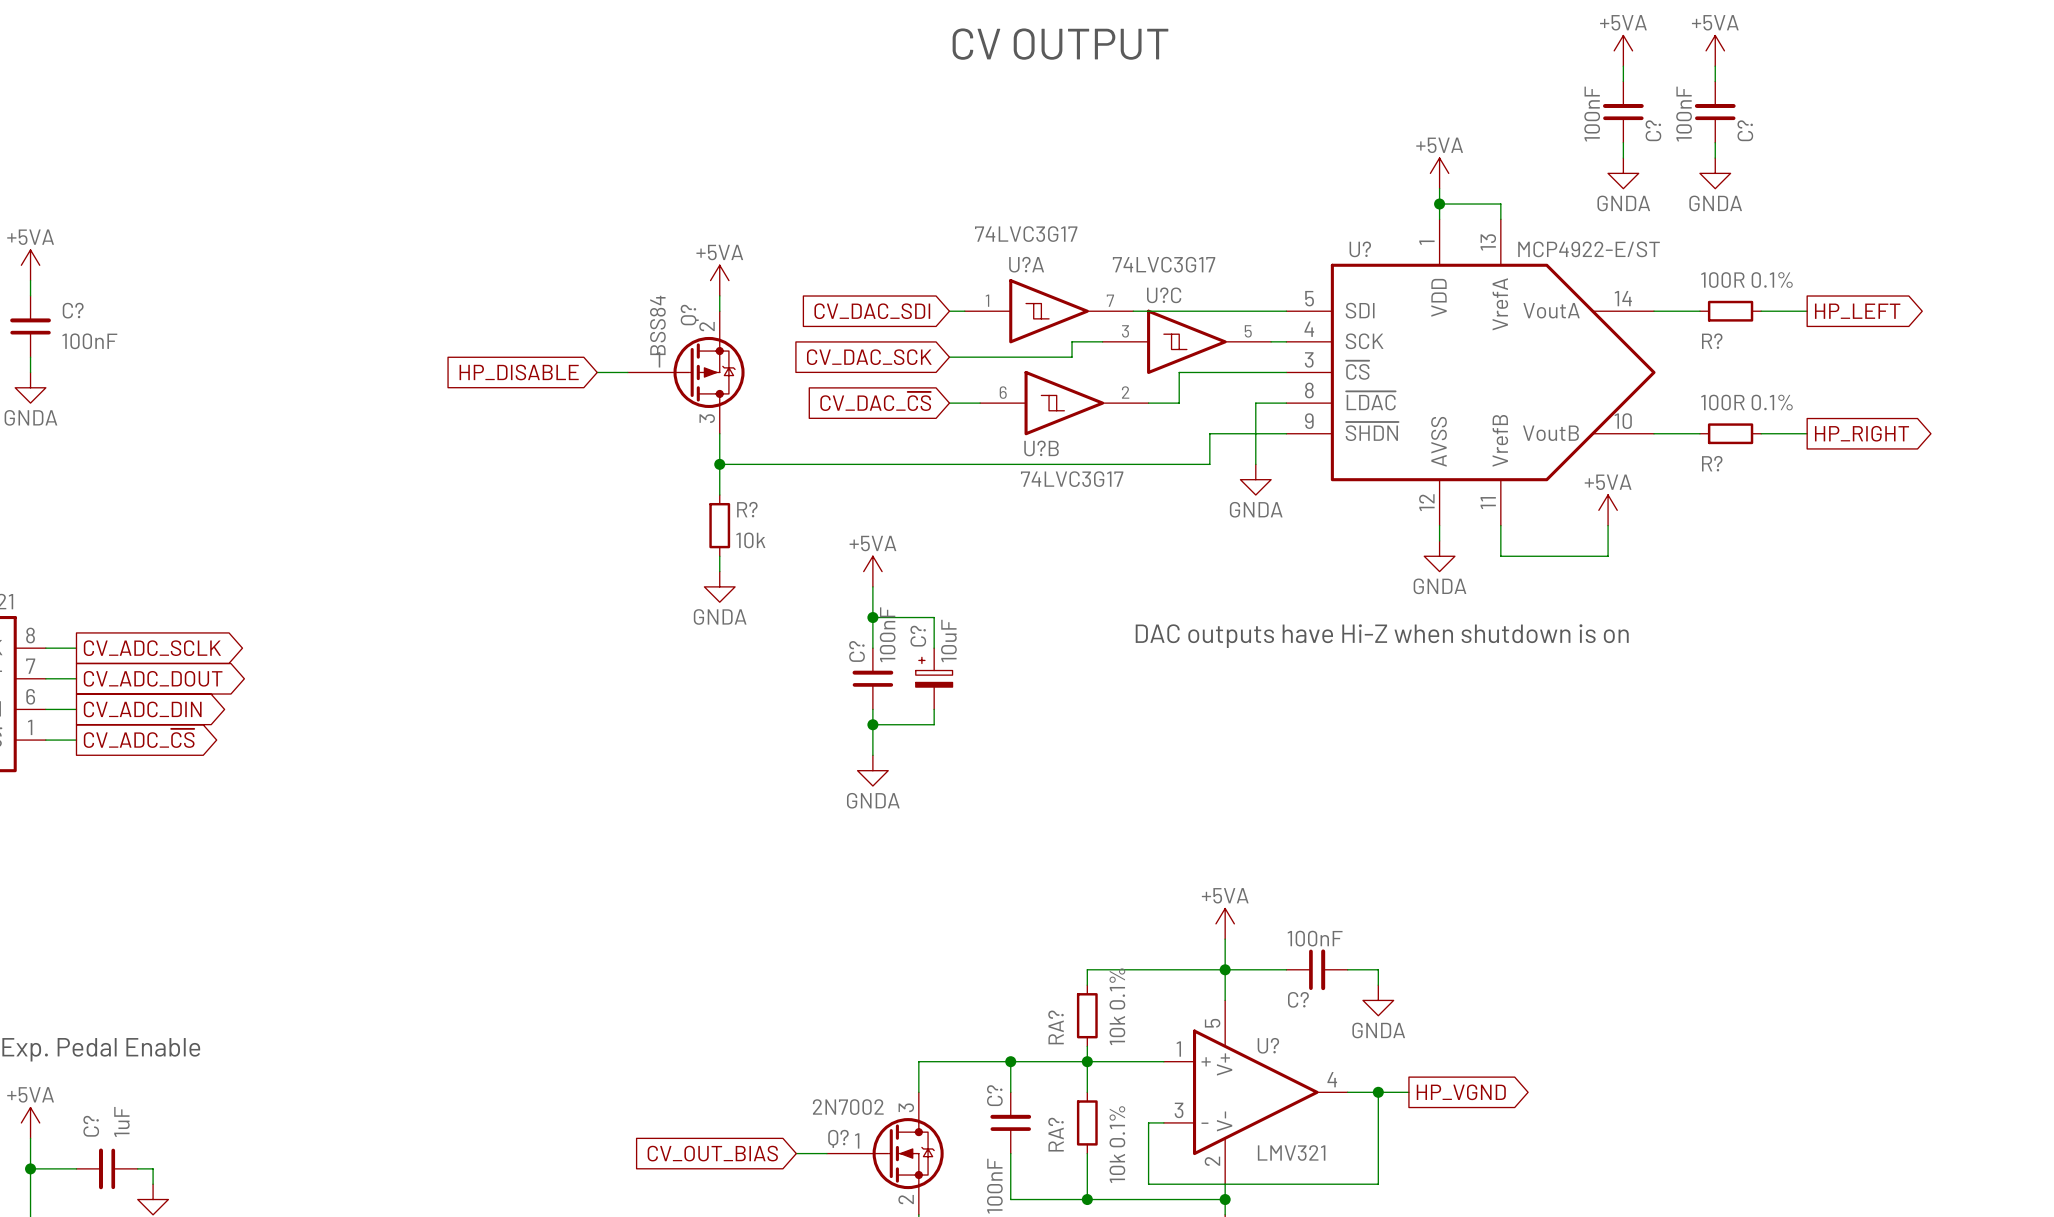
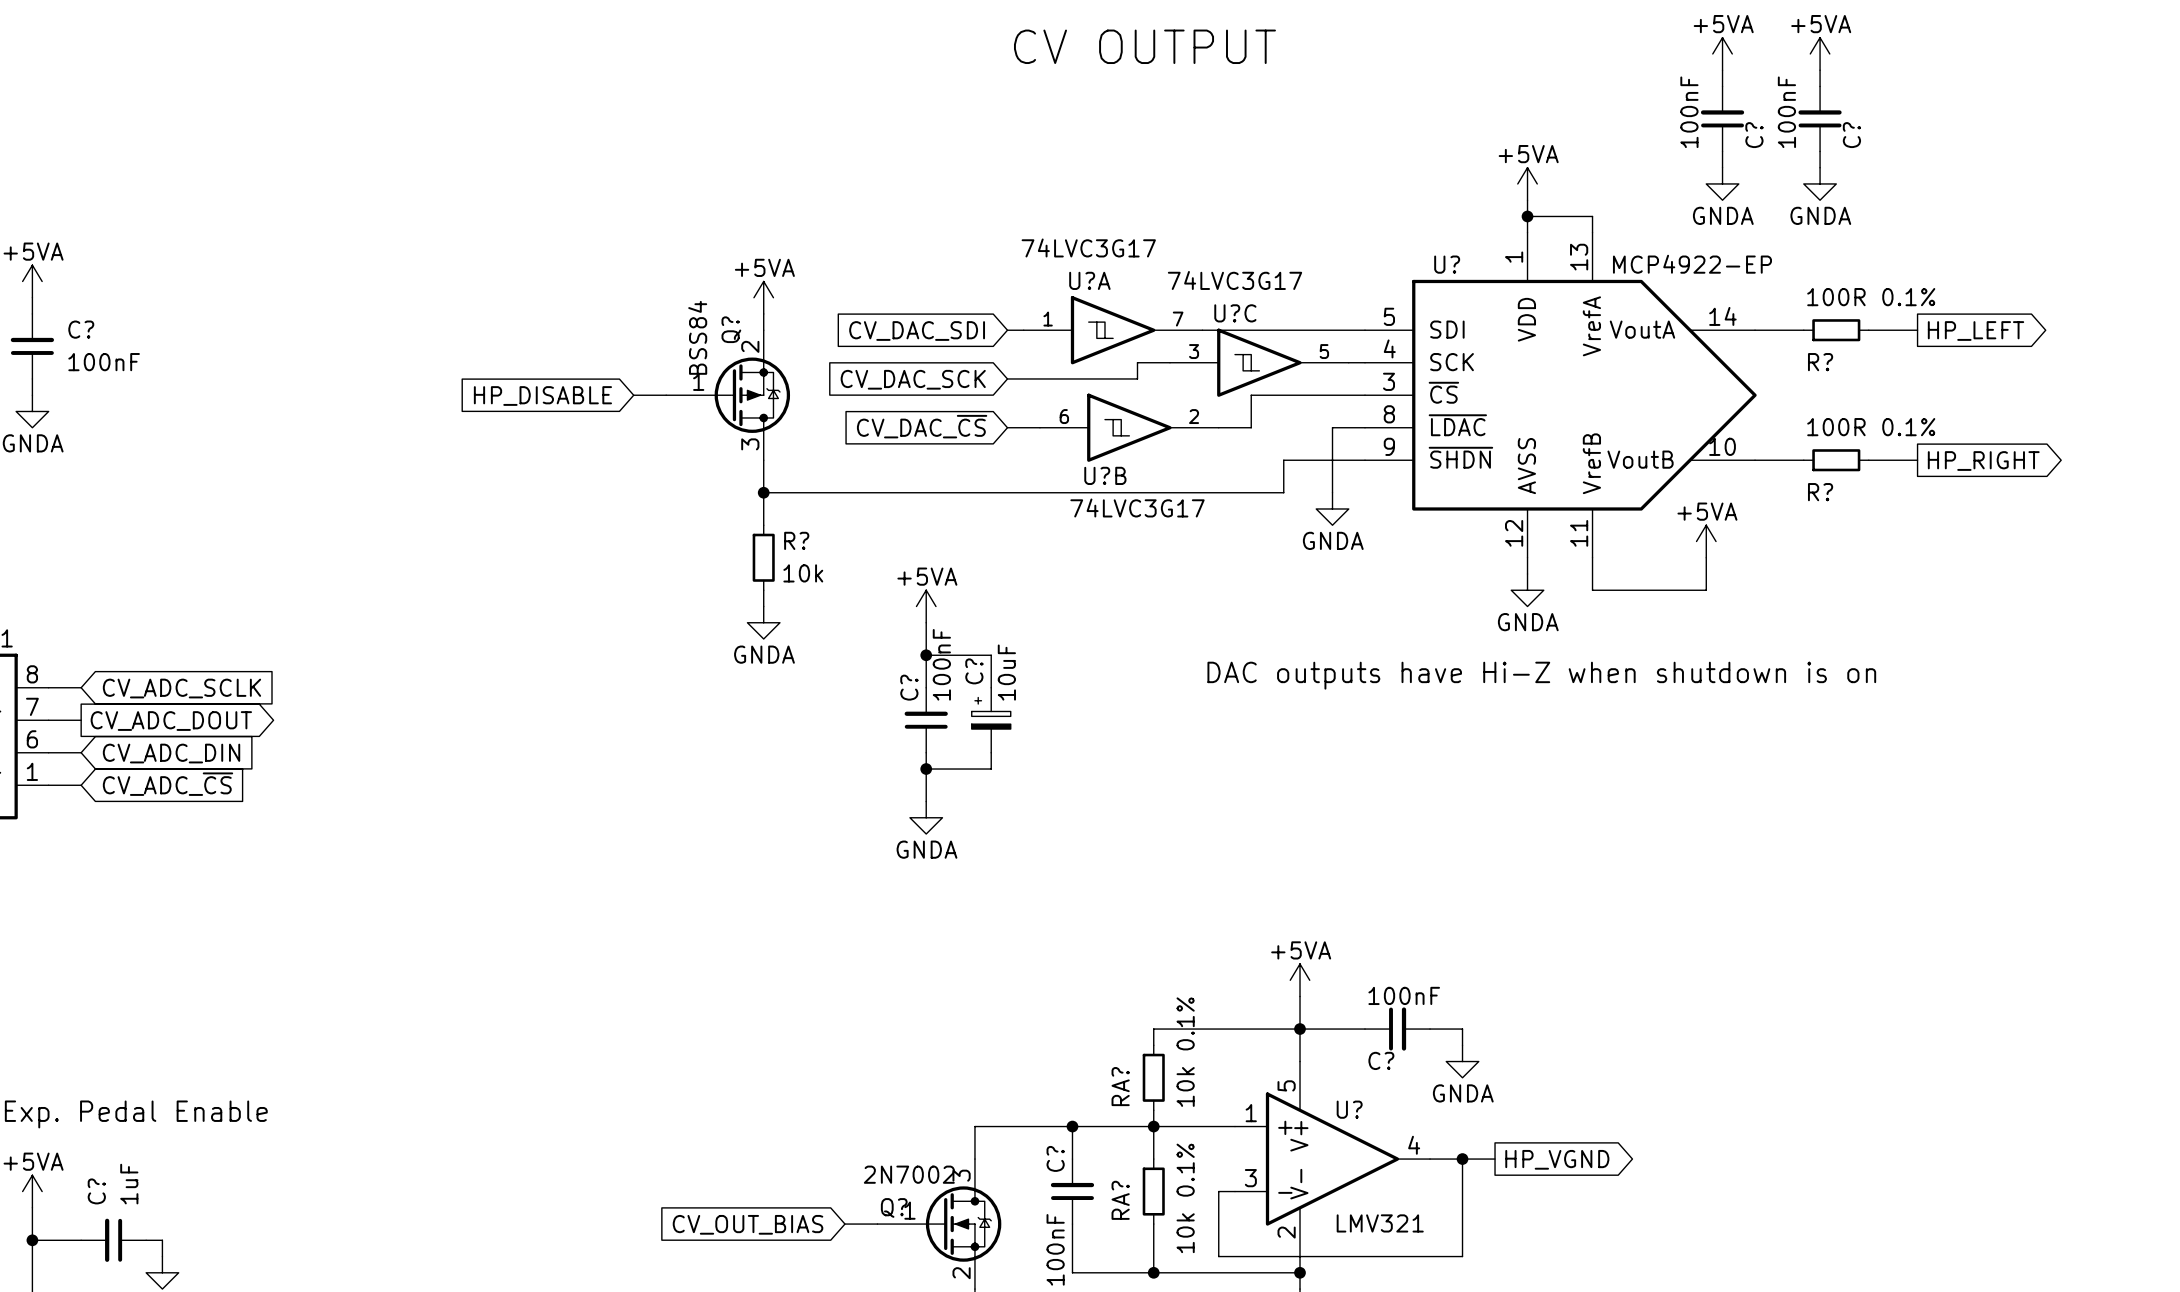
U? value: MCP4922-E/ST (1589, 249) -> MCP4922-EP (1692, 264)
global label shape: output (152, 648) -> input (181, 688)
global label shape: output (142, 709) -> input (171, 753)
global label shape: output (139, 738) -> input (168, 784)

